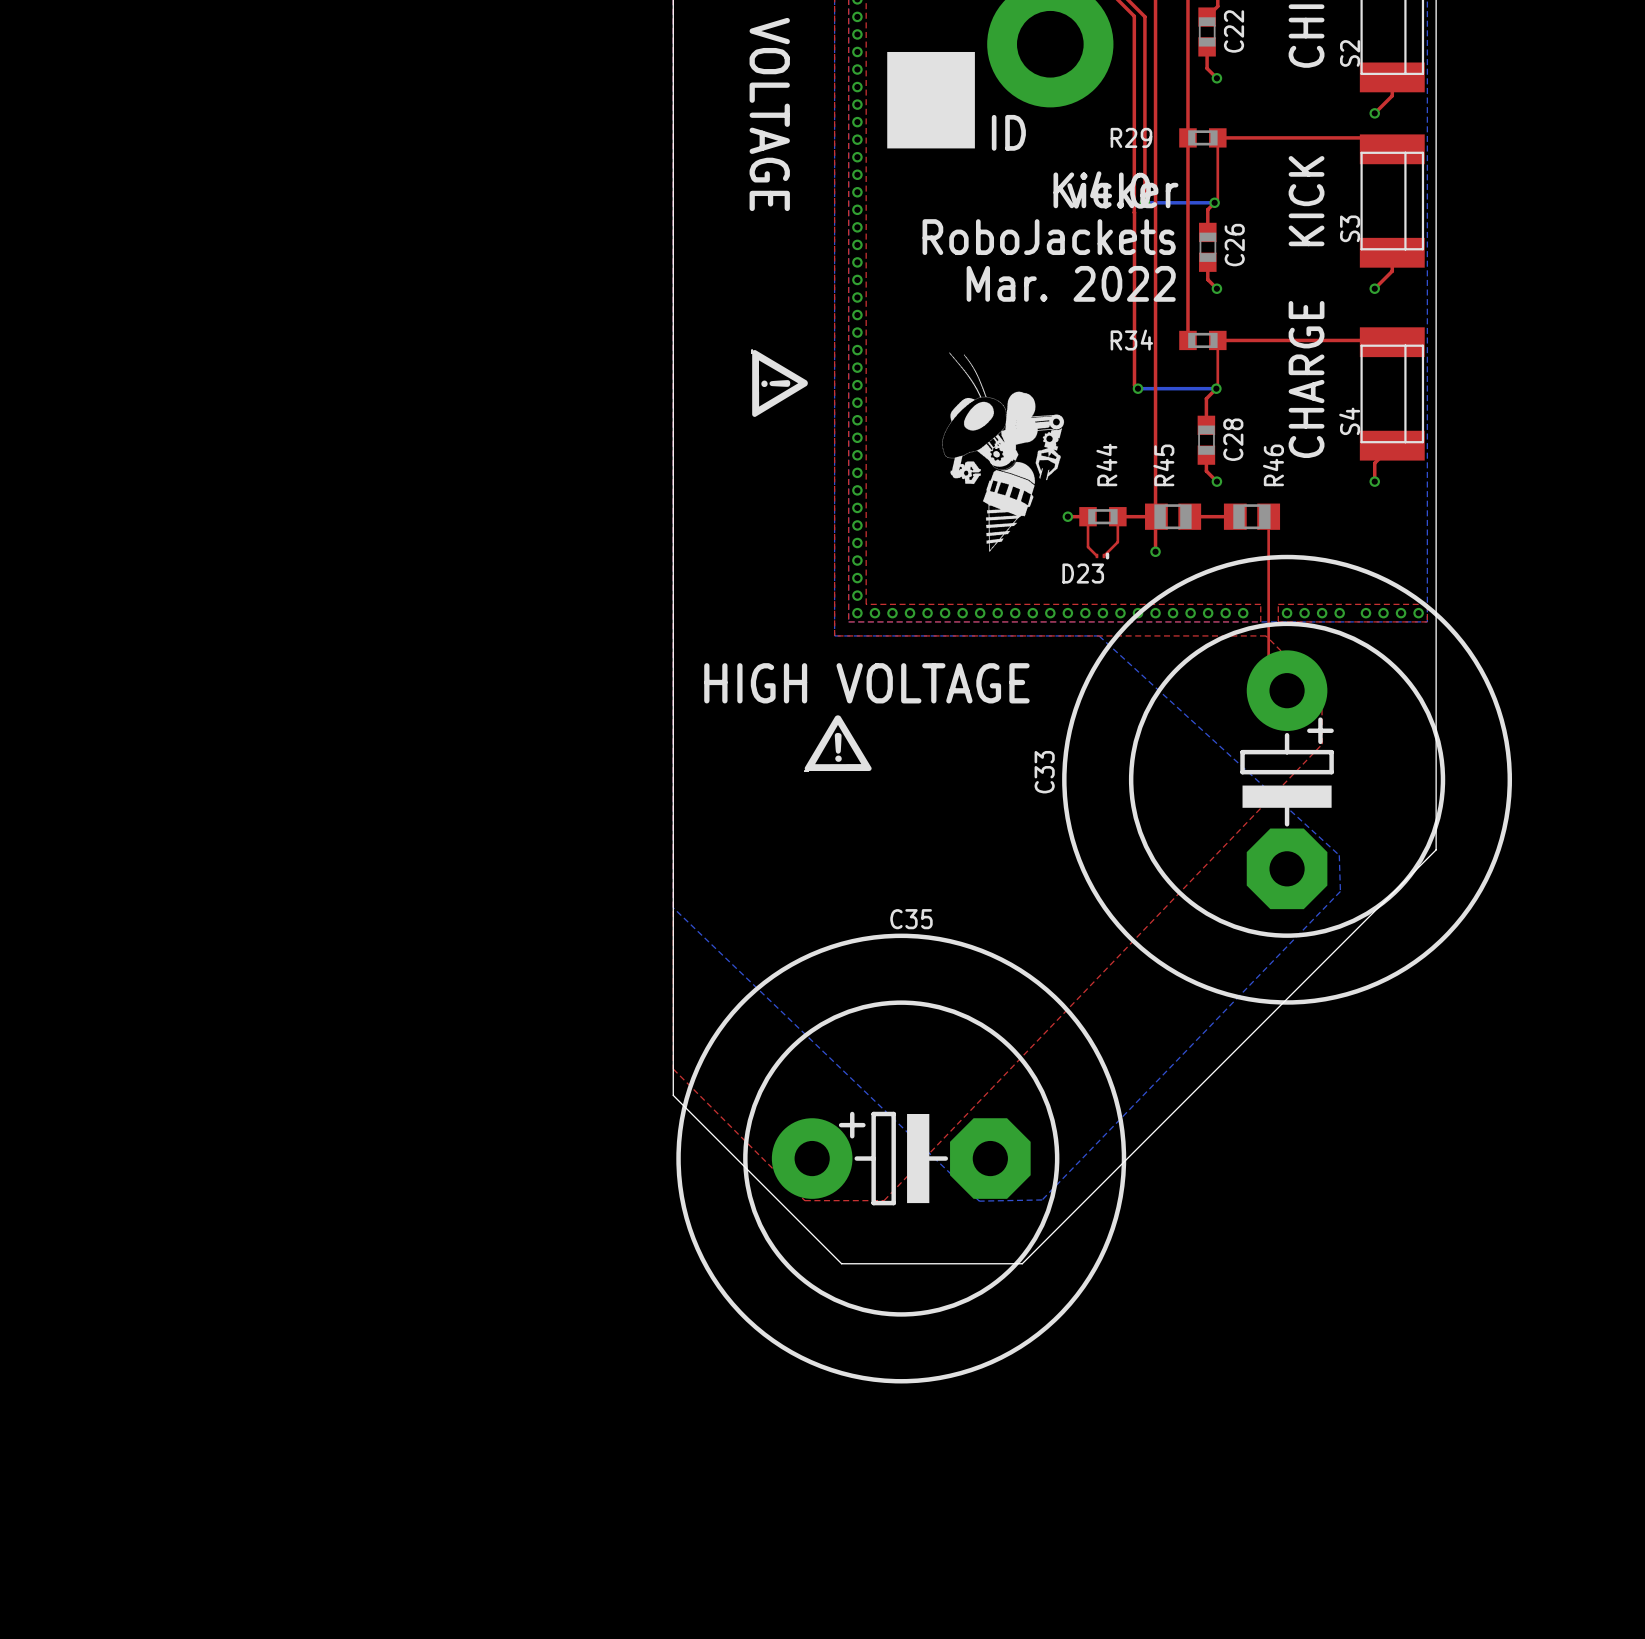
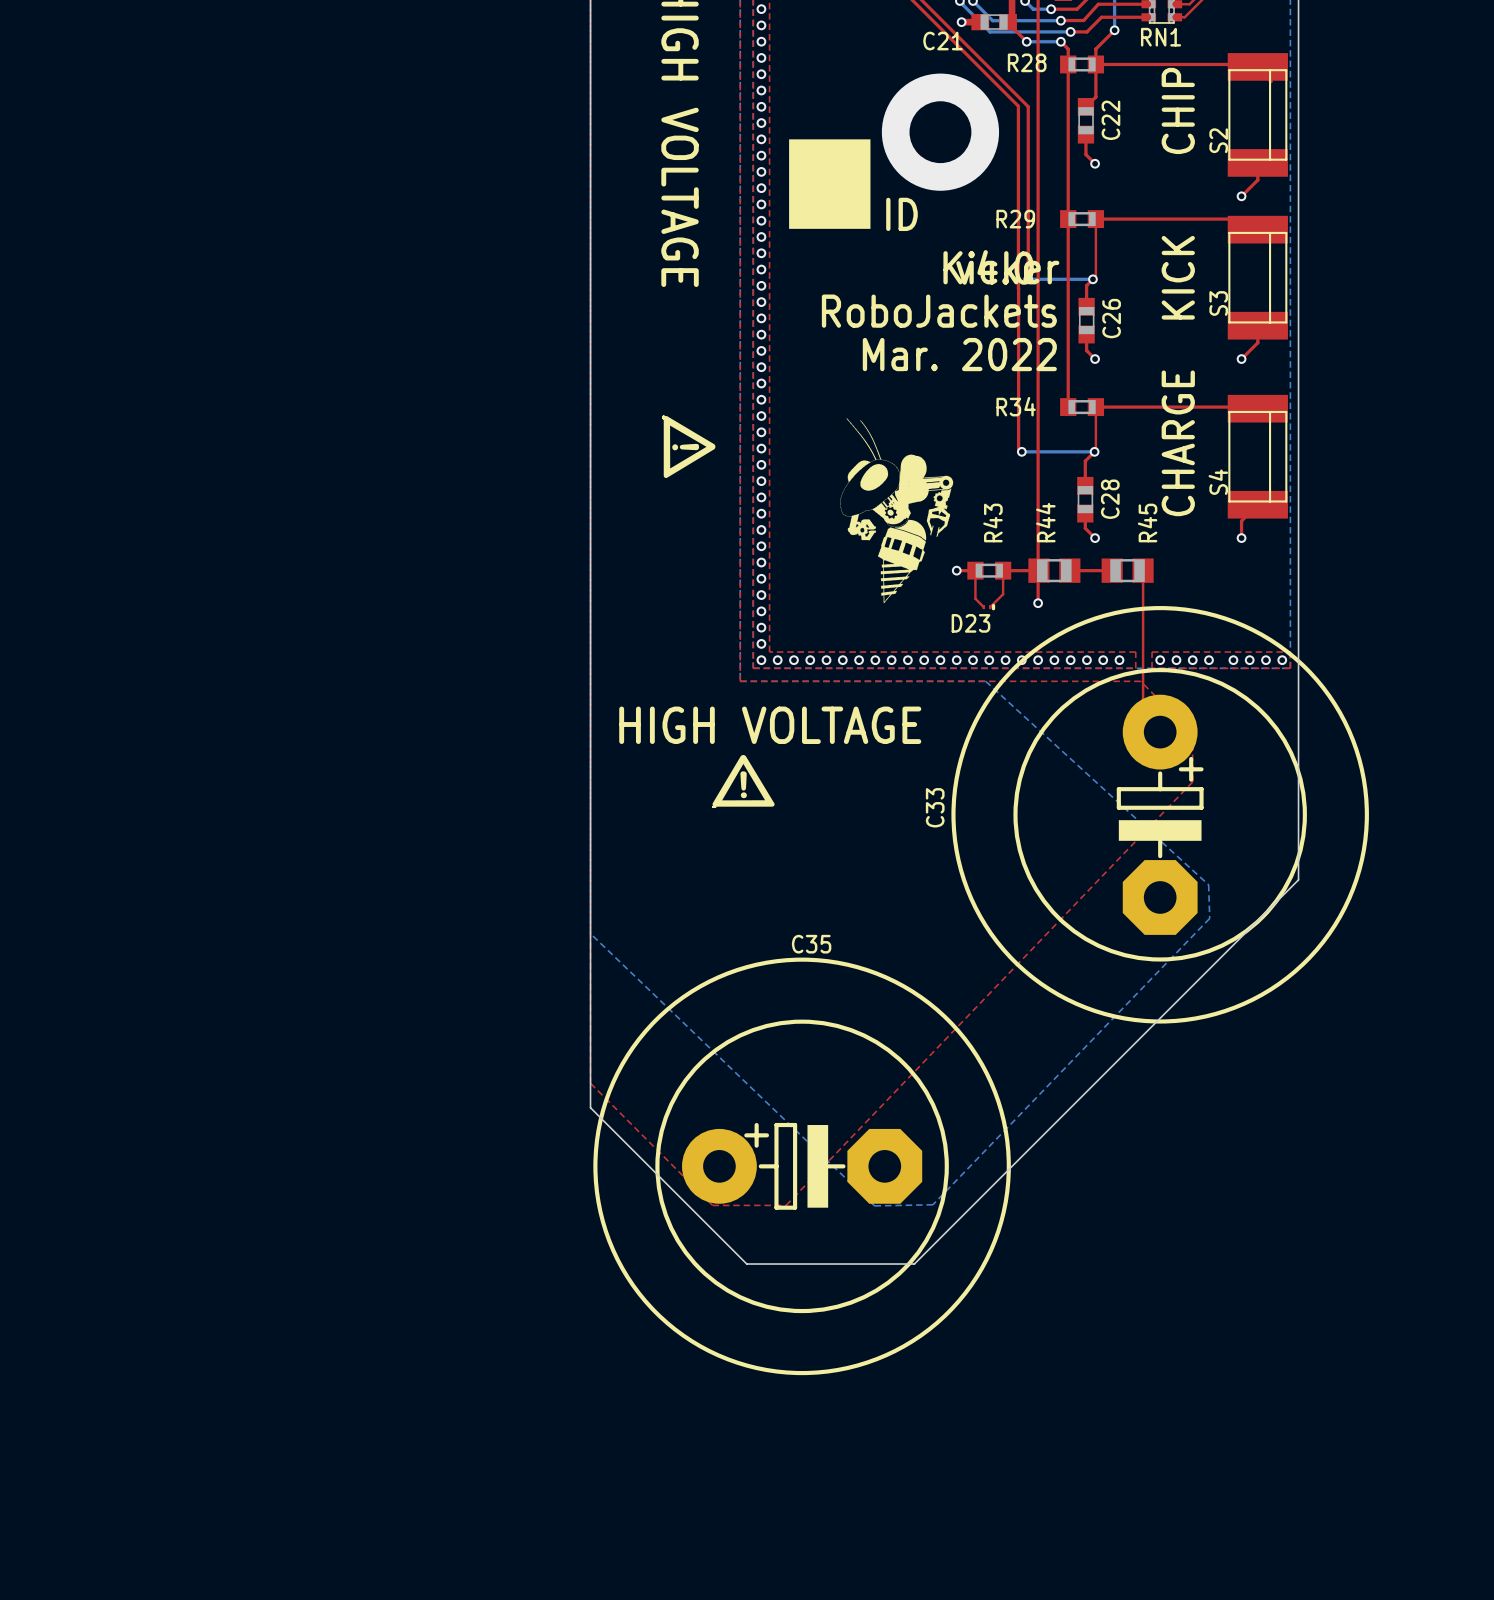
R44 name: R44 (1106, 464) -> R43 (992, 523)
R45 name: R45 (1163, 465) -> R44 (1045, 522)
R46 name: R46 (1273, 465) -> R45 (1147, 523)

